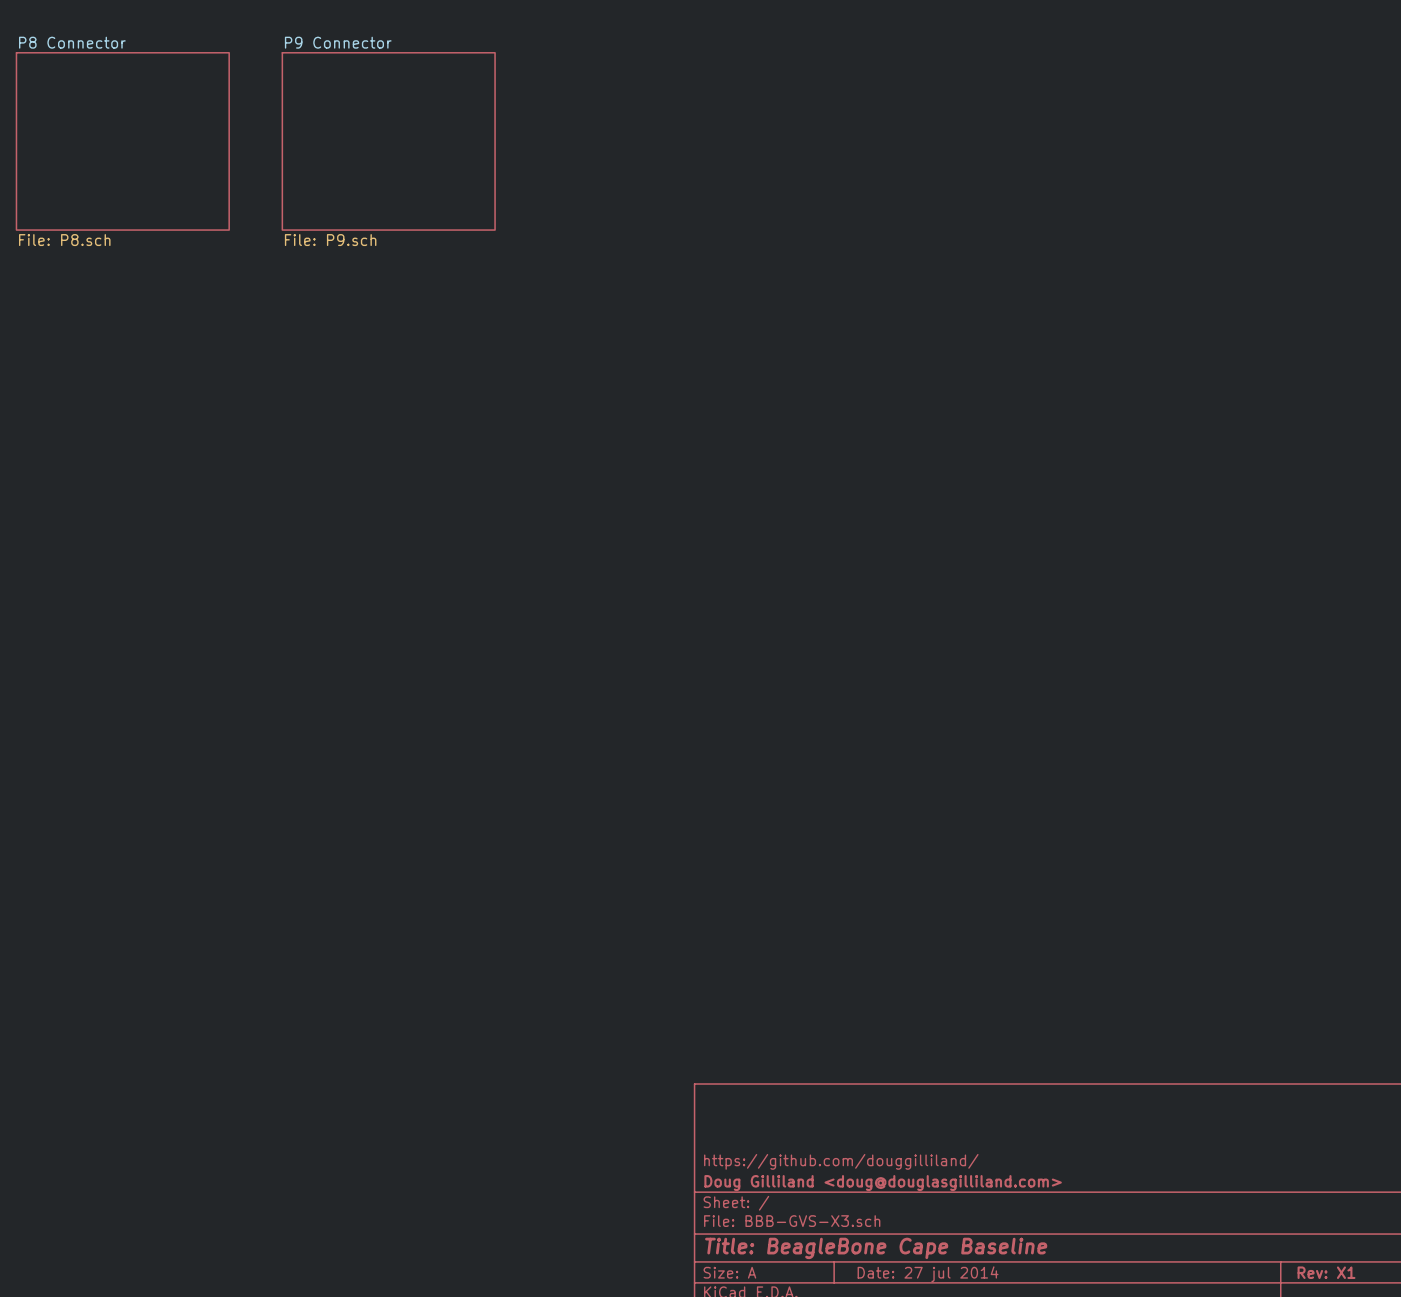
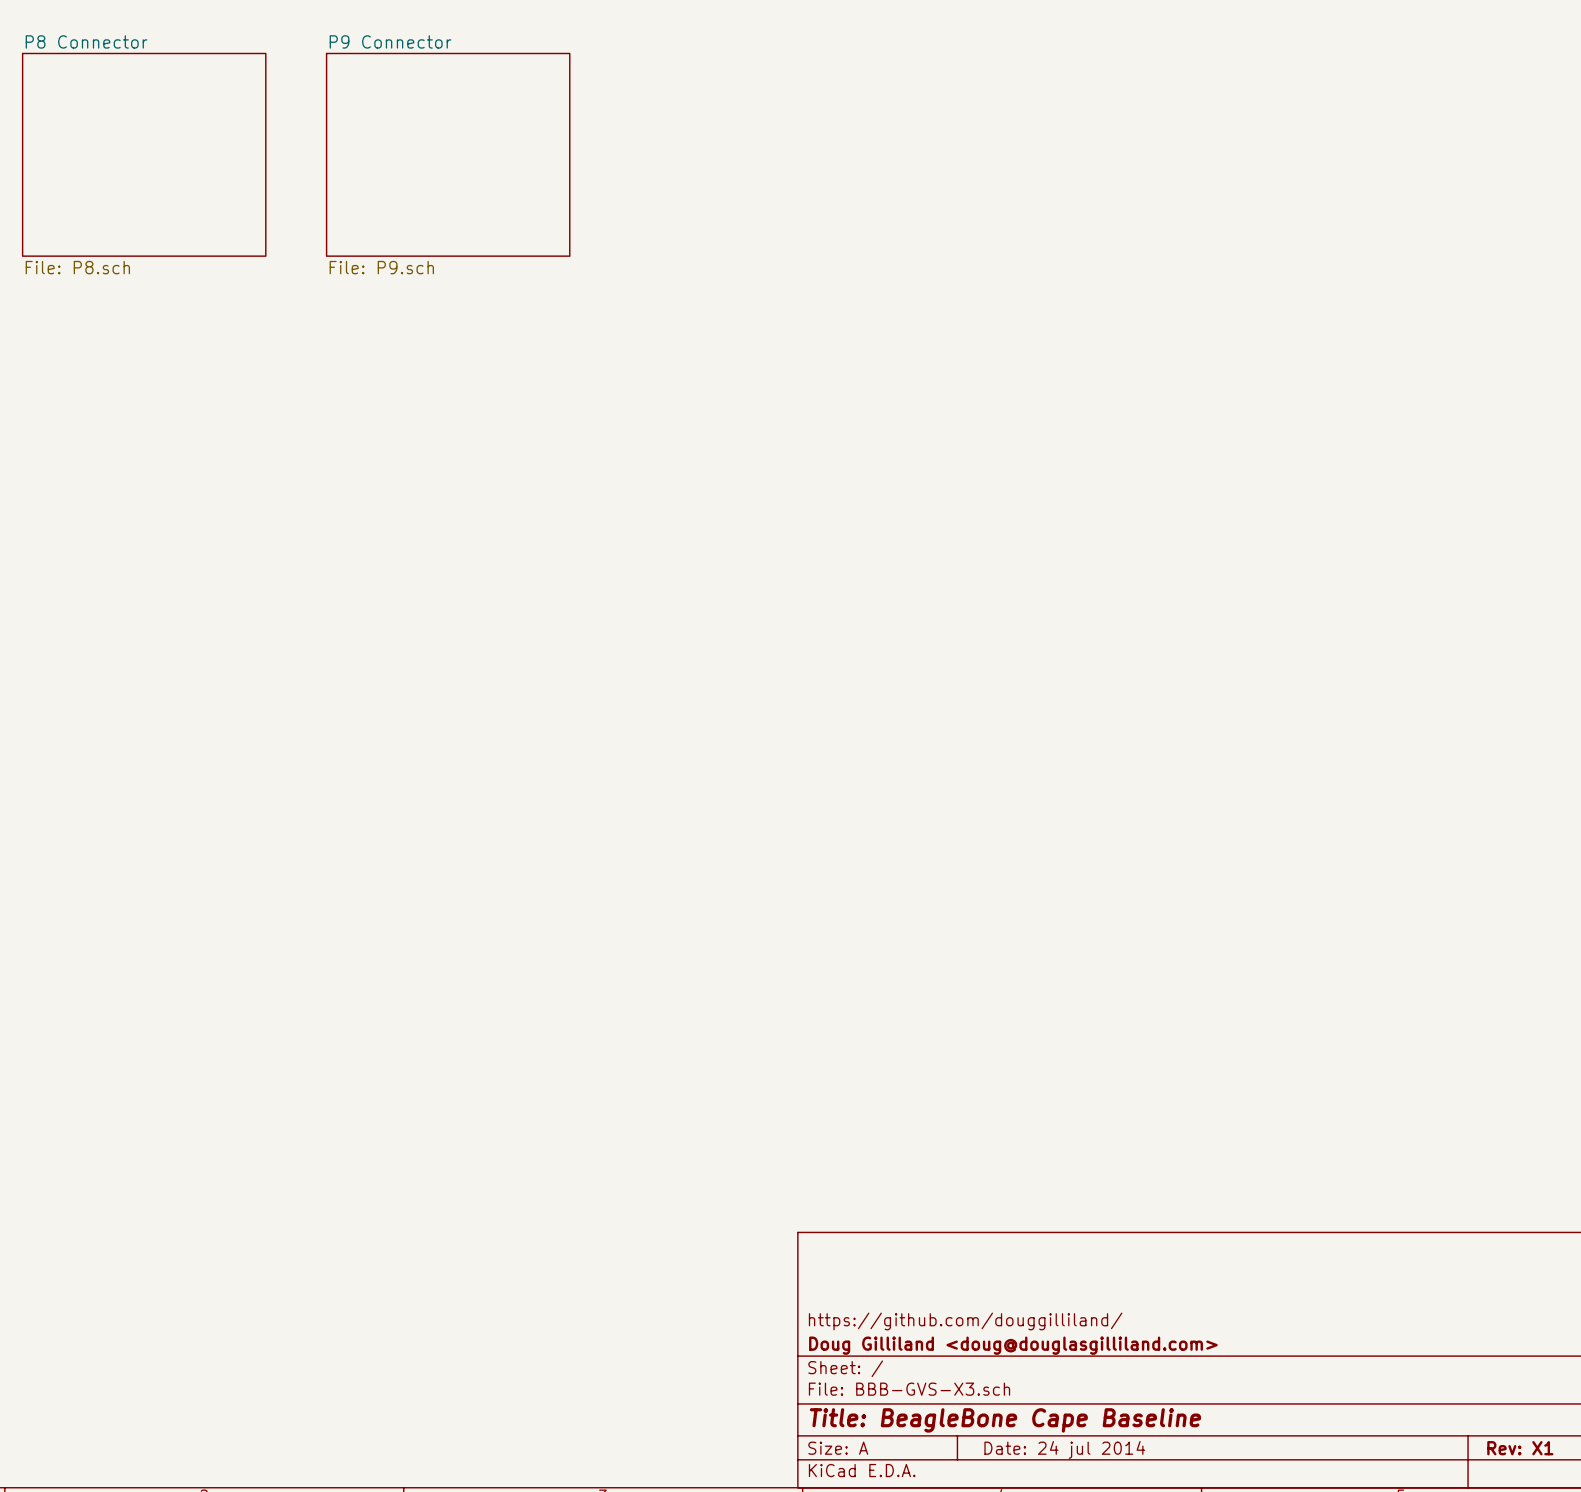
title block: Date: 27 jul 2014 (928, 1274) -> Date: 24 jul 2014 (1064, 1449)

